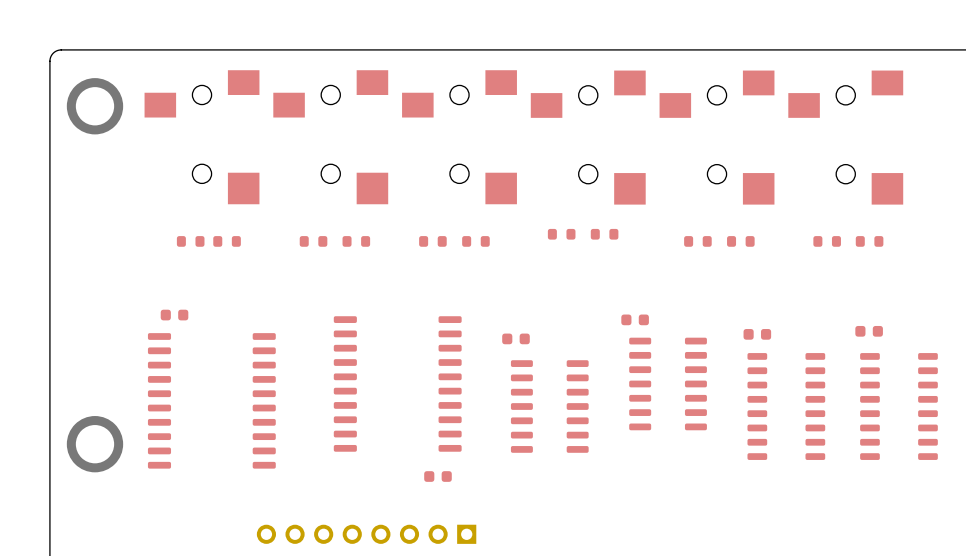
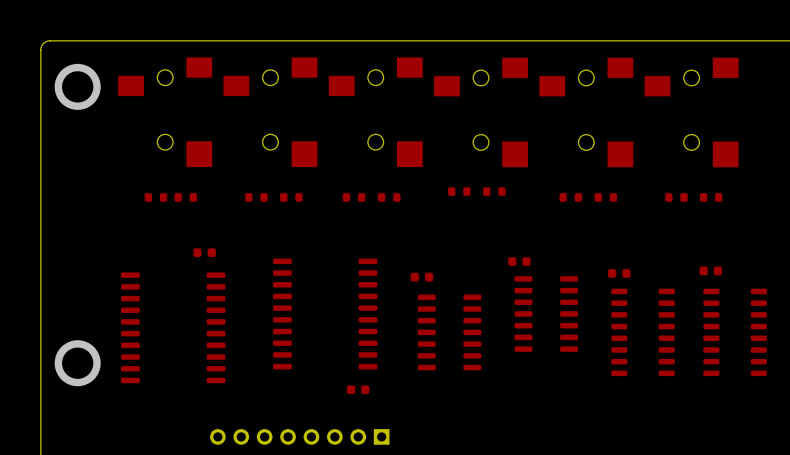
part position: (174, 315) -> (204, 252)

